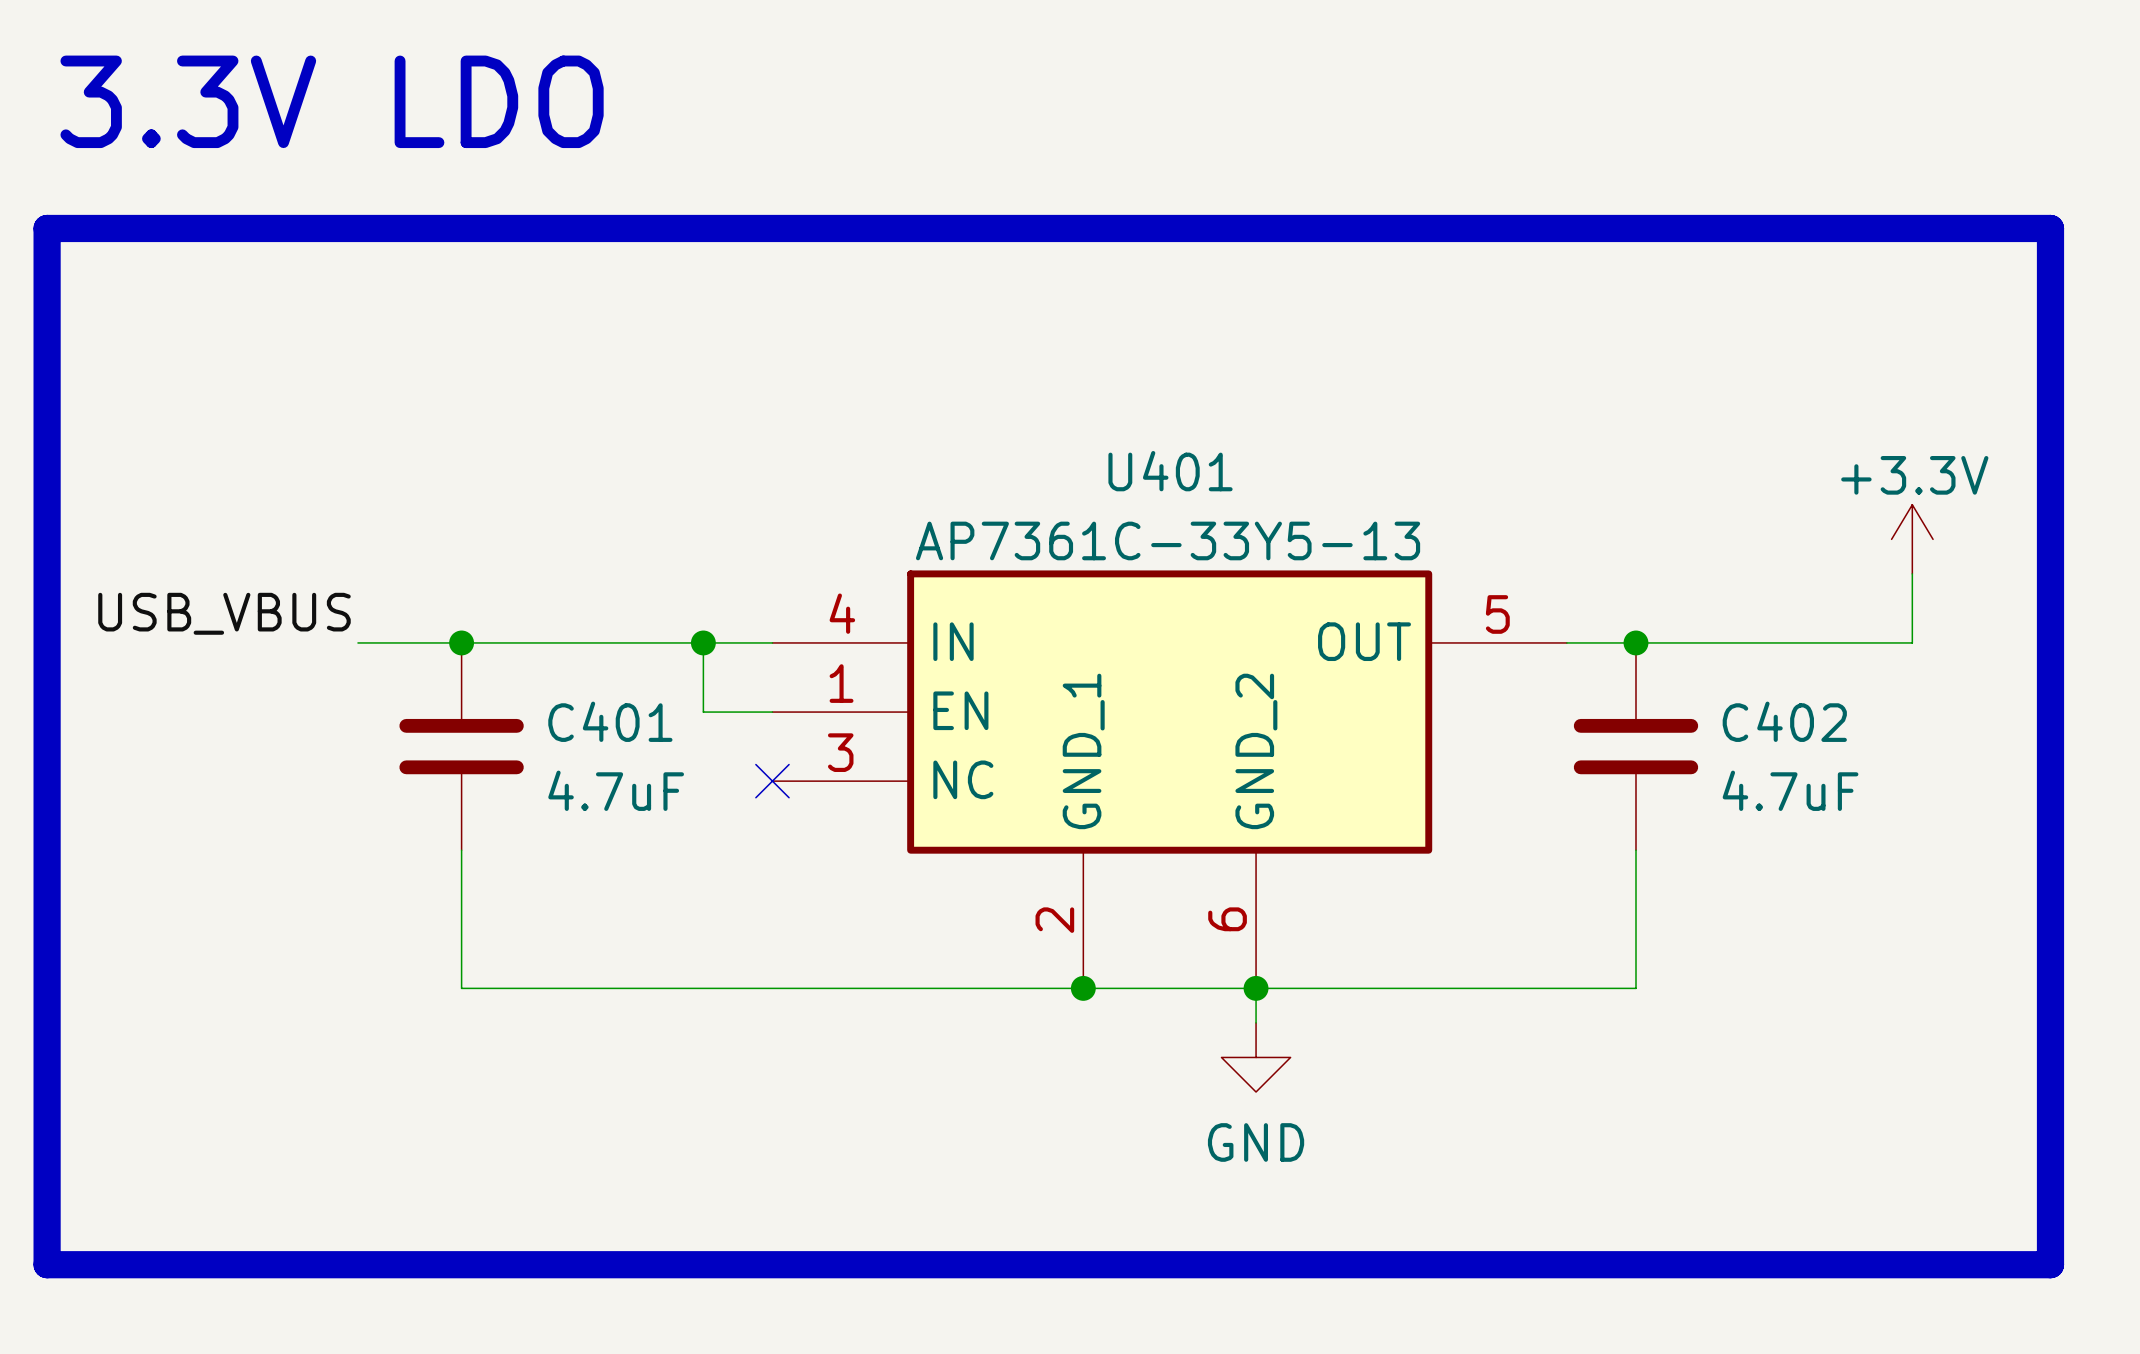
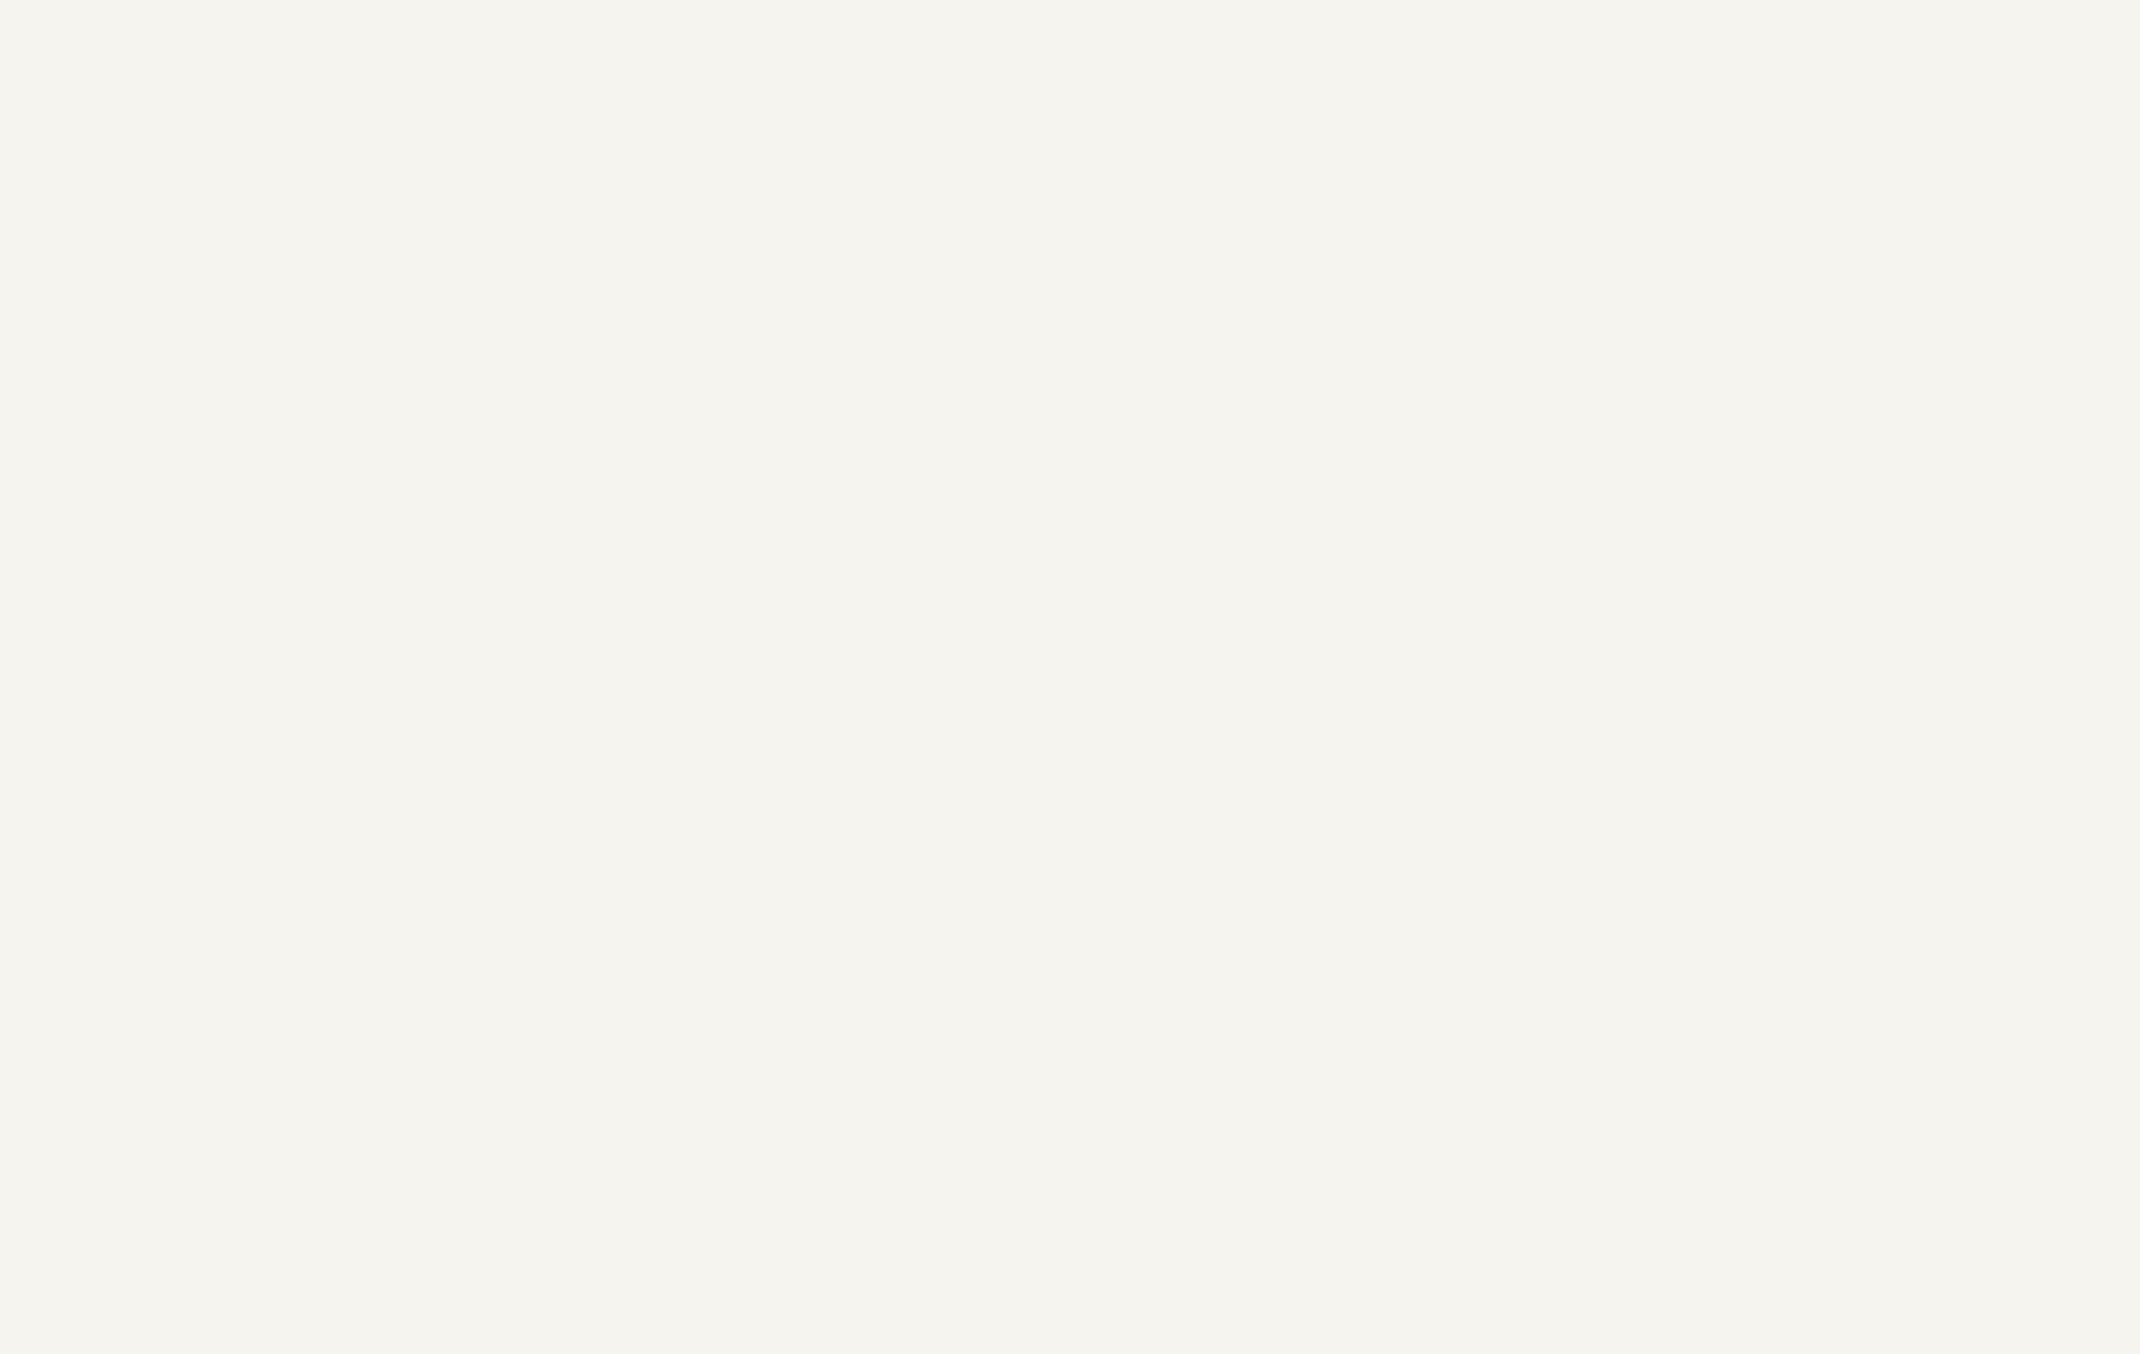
text: 3.3V LDO (332, 101) -> none
line: (47, 228) (47, 1264) (2050, 1264) (2050, 228) (47, 228) -> none
power symbol: +3.3V (1912, 539) -> none
wire: (1912, 573) (1912, 642) (1566, 642) -> none
label: USB_VBUS (224, 613) -> none
wire: (357, 642) (772, 642) -> none
junction: (461, 642) -> none
wire: (703, 642) (703, 712) (772, 712) -> none
junction: (703, 642) -> none
junction: (1635, 642) -> none
C401: 4.7uF (461, 746) -> none
C402: 4.7uF (1635, 746) -> none
U401: AP7361C-33Y5-13 (1169, 779) -> none
no-connect mark: (772, 781) -> none
wire: (461, 850) (461, 988) (1635, 988) (1635, 850) -> none
junction: (1083, 988) -> none
wire: (1256, 988) (1256, 1022) -> none
junction: (1256, 988) -> none
power symbol: GND (1256, 1057) -> none

